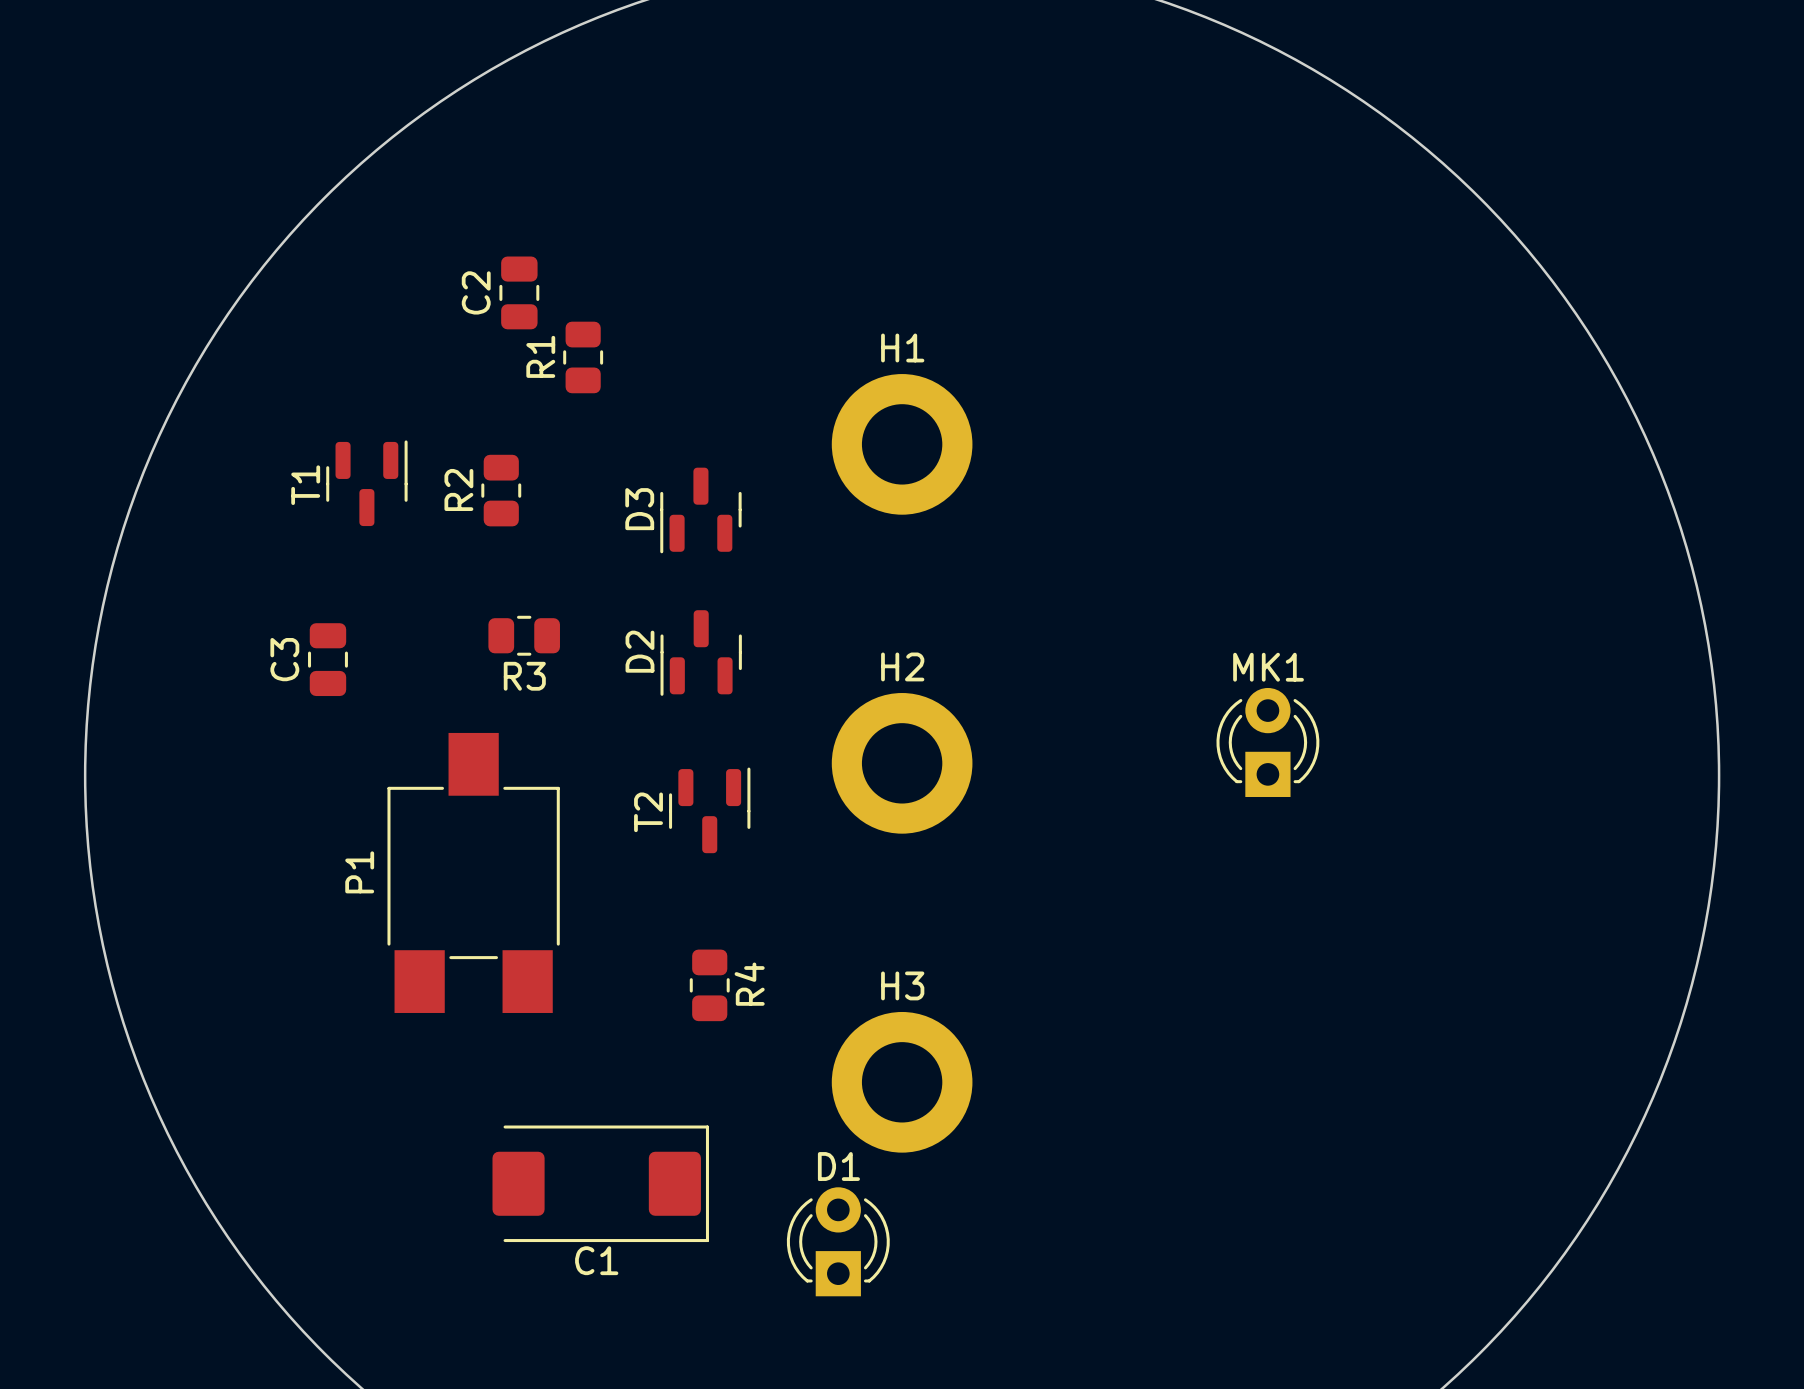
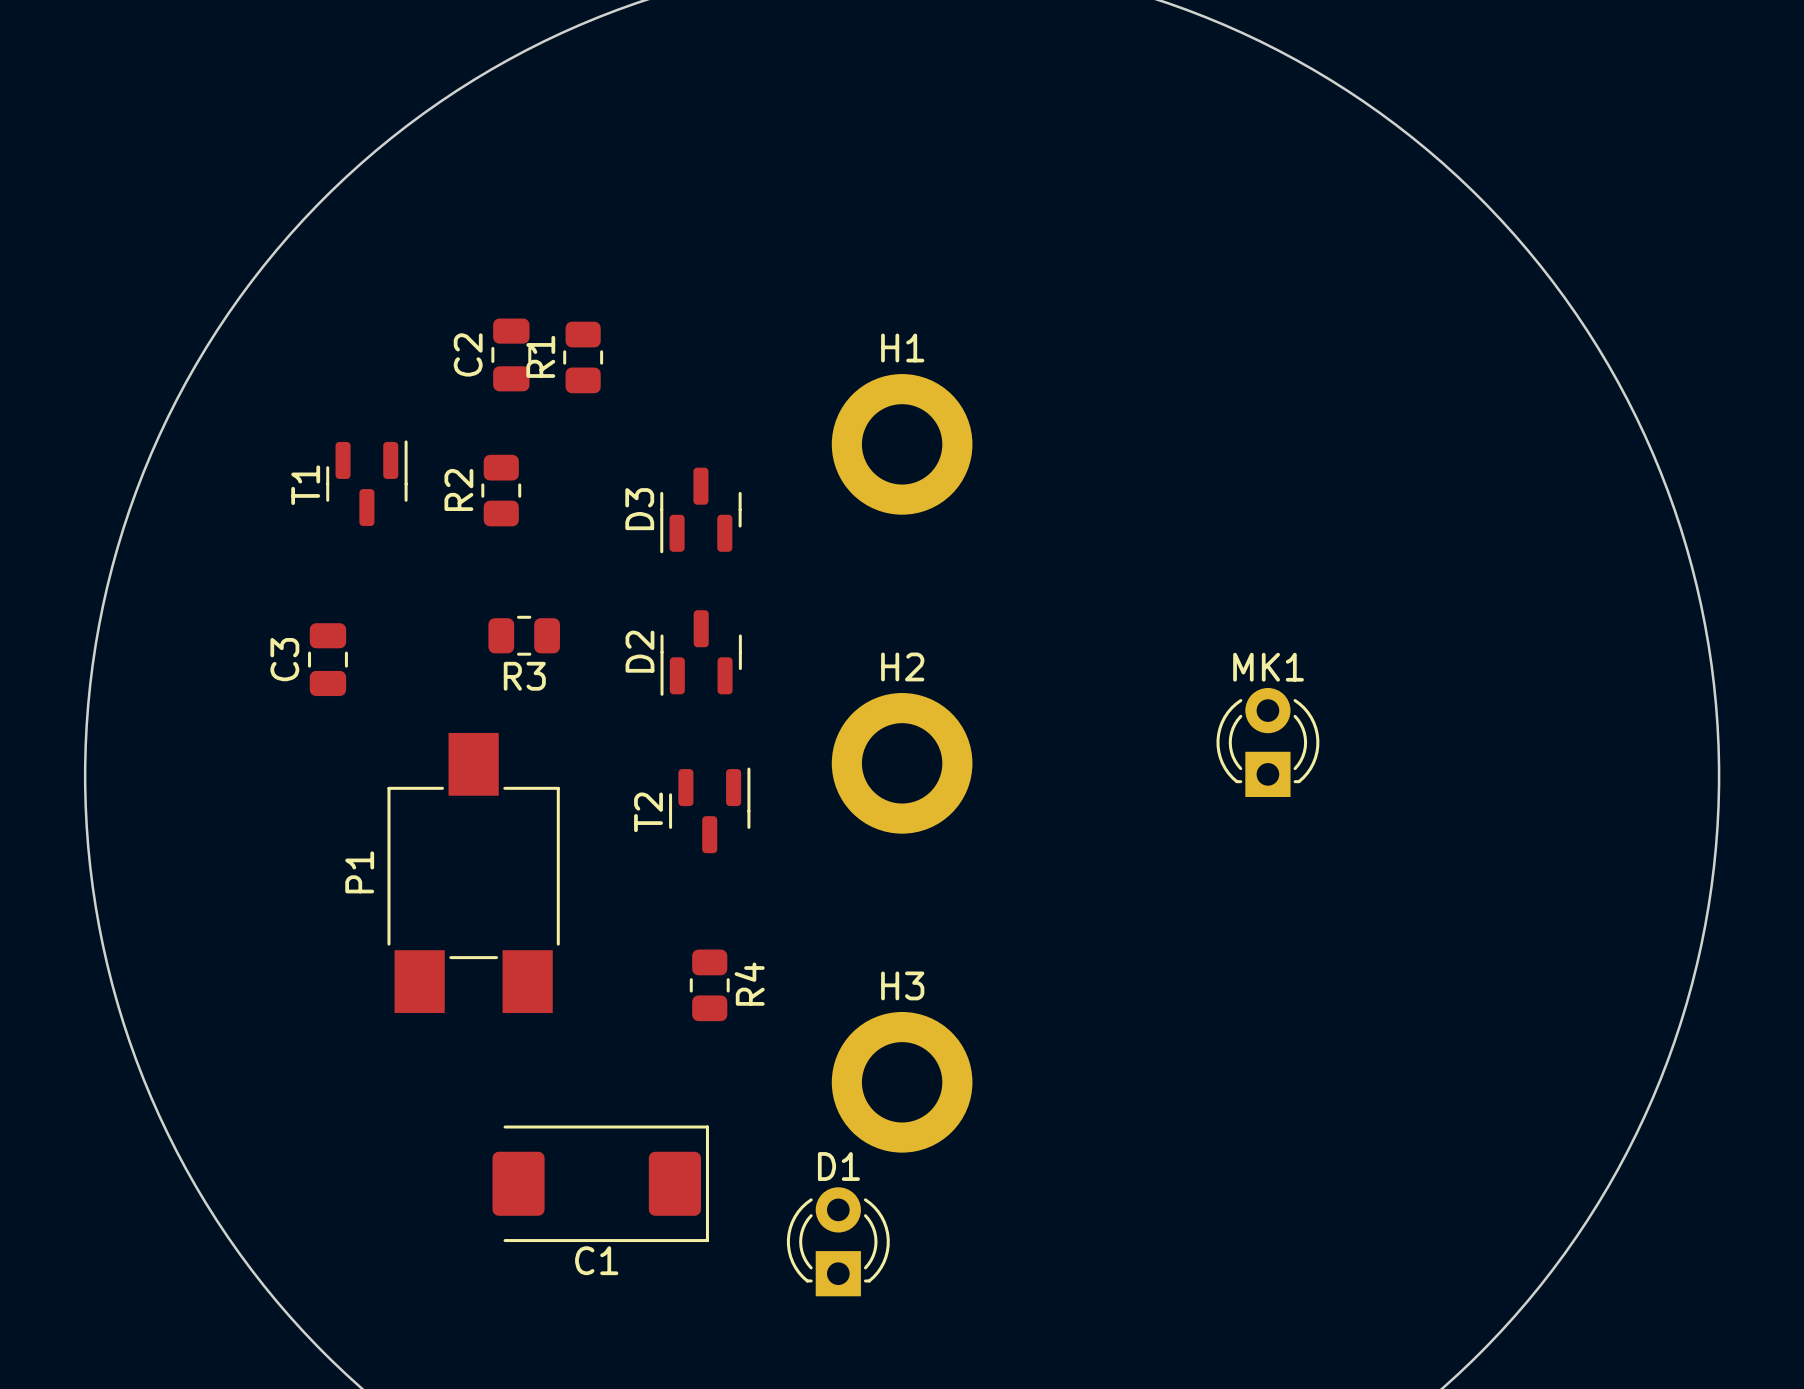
C2 position: (519, 292) -> (511, 354)

